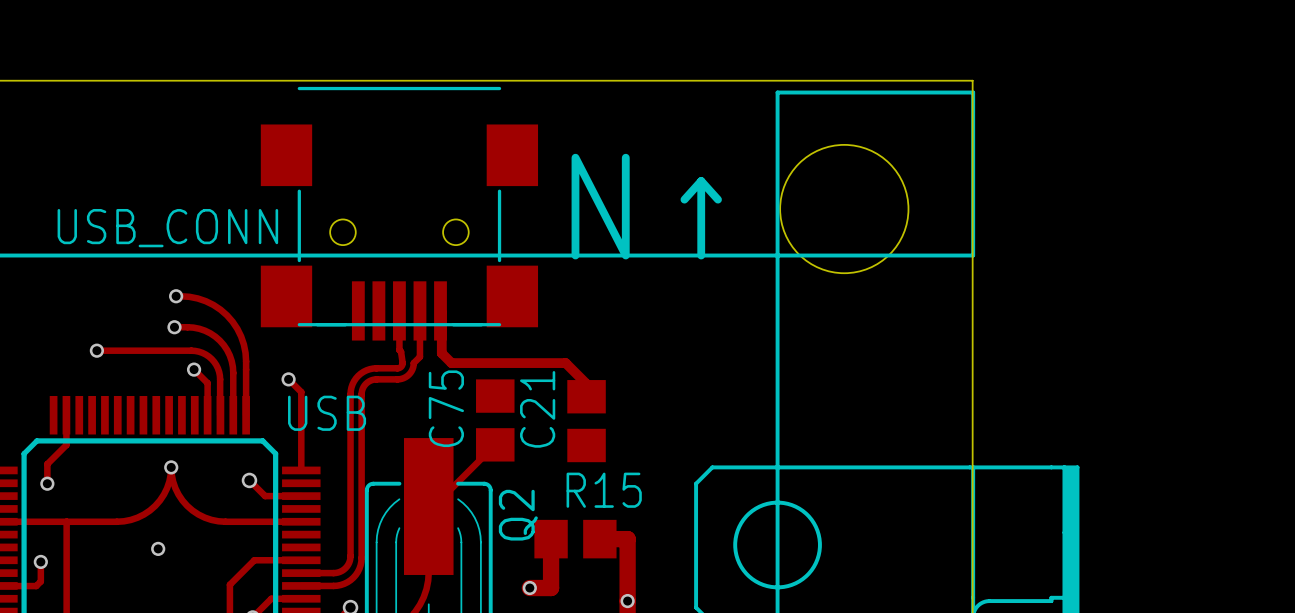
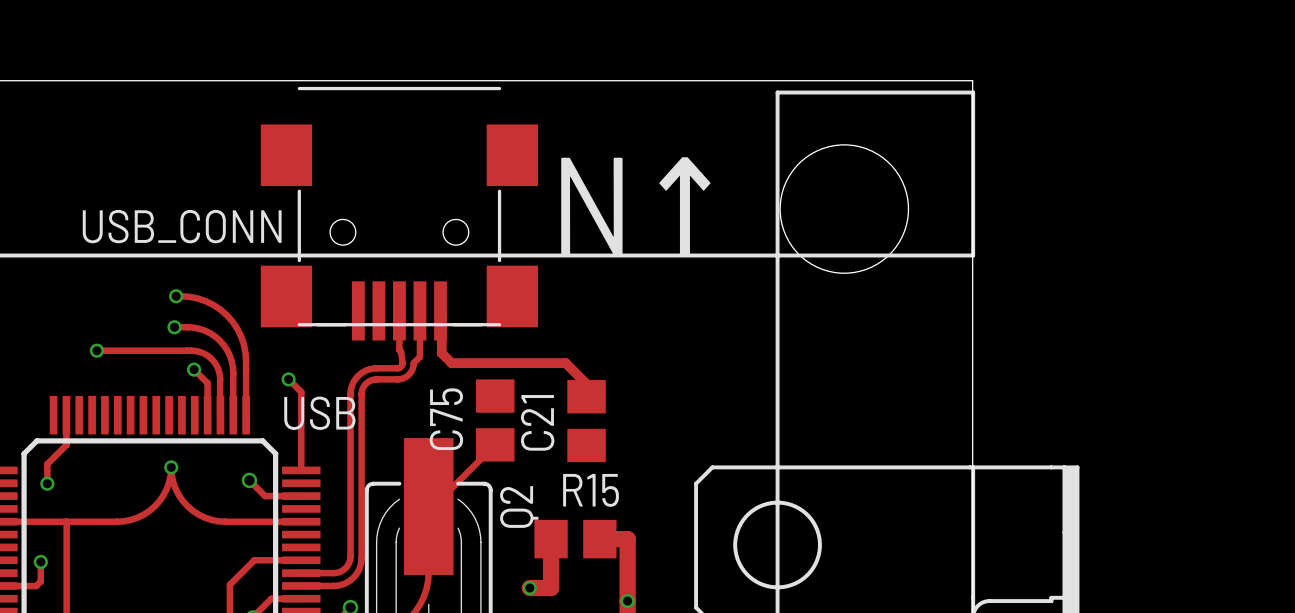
via: (158, 548) -> none

